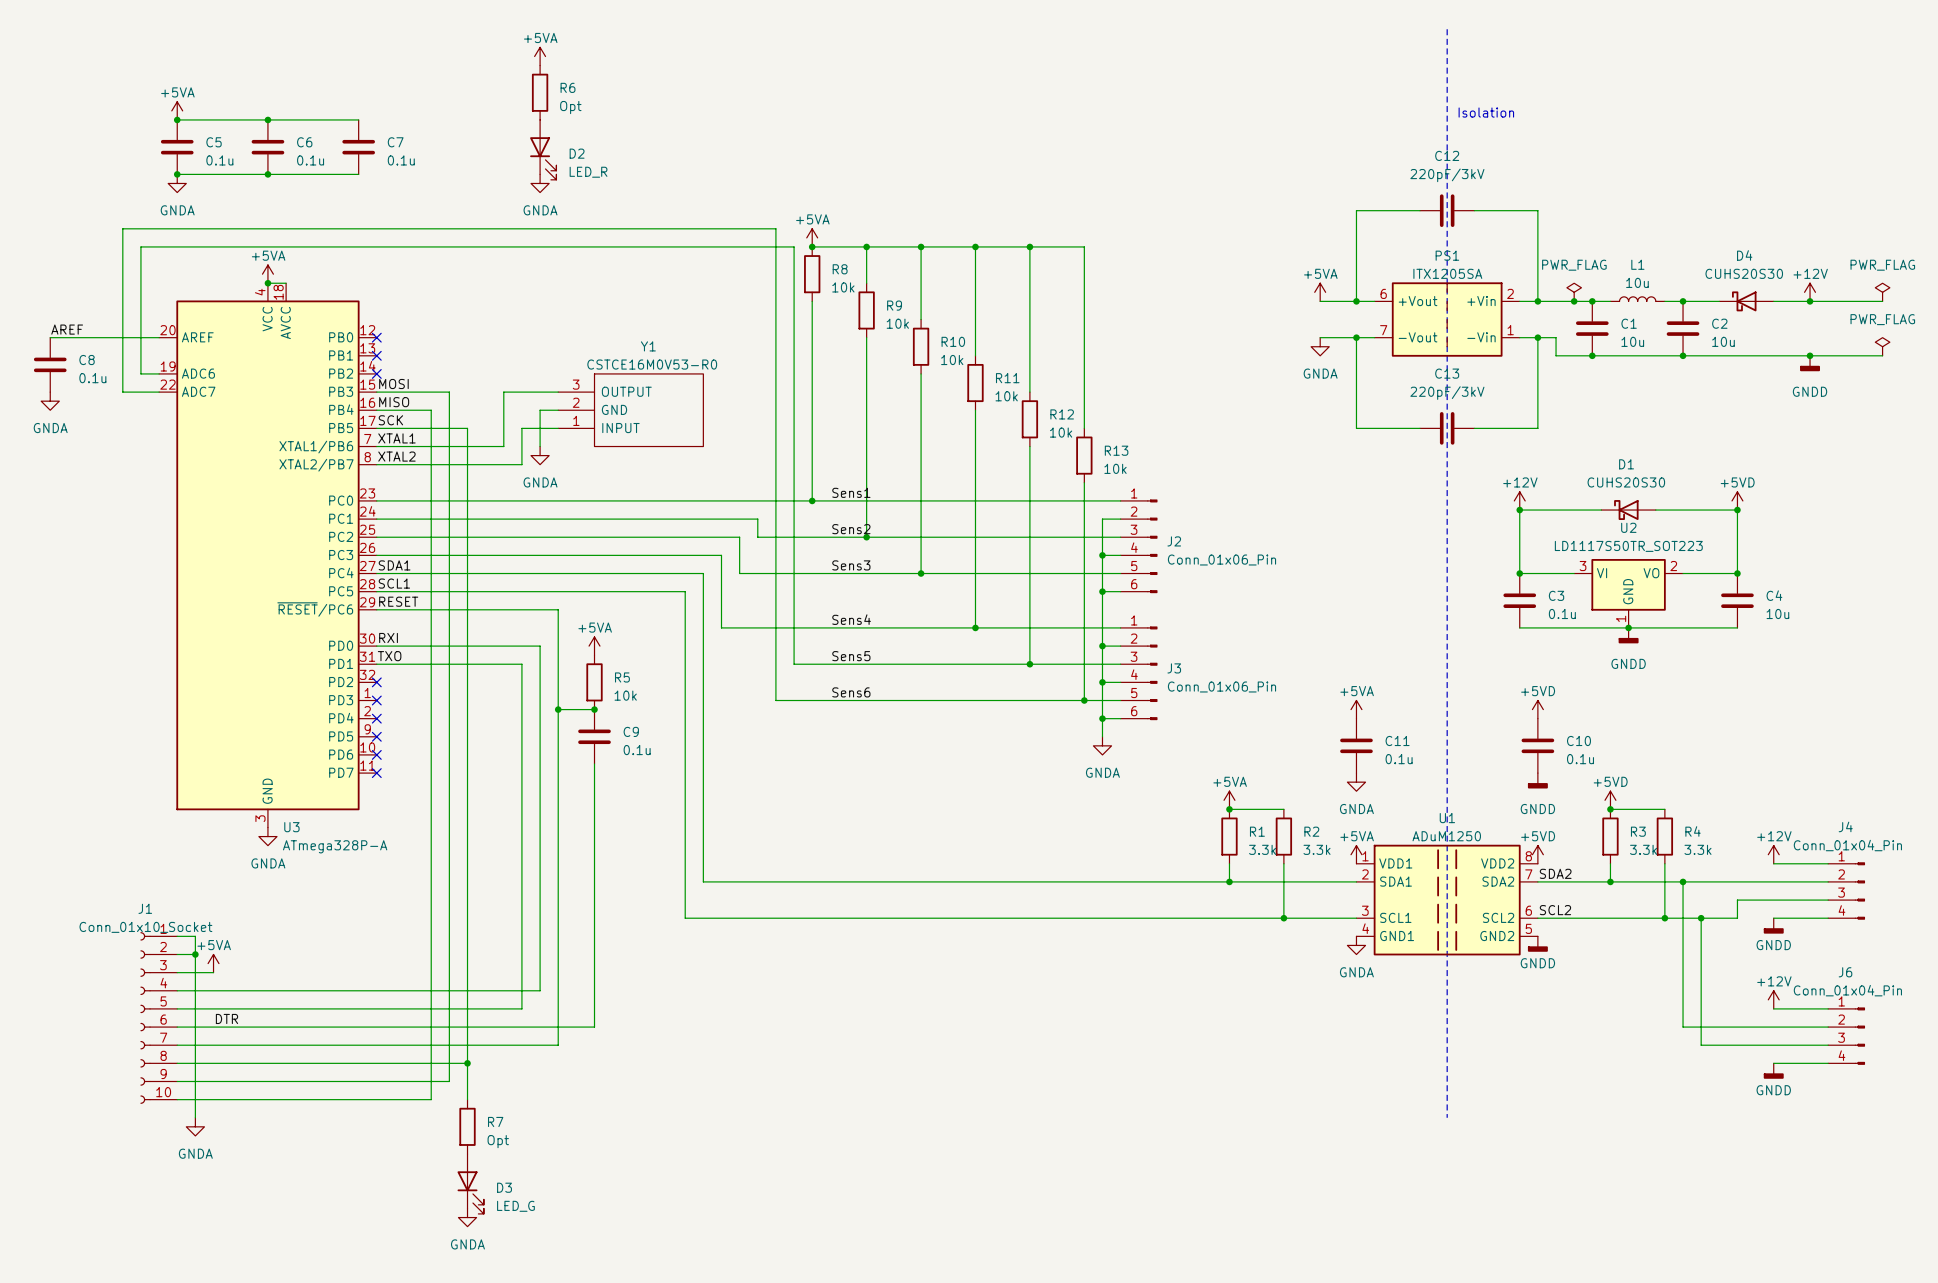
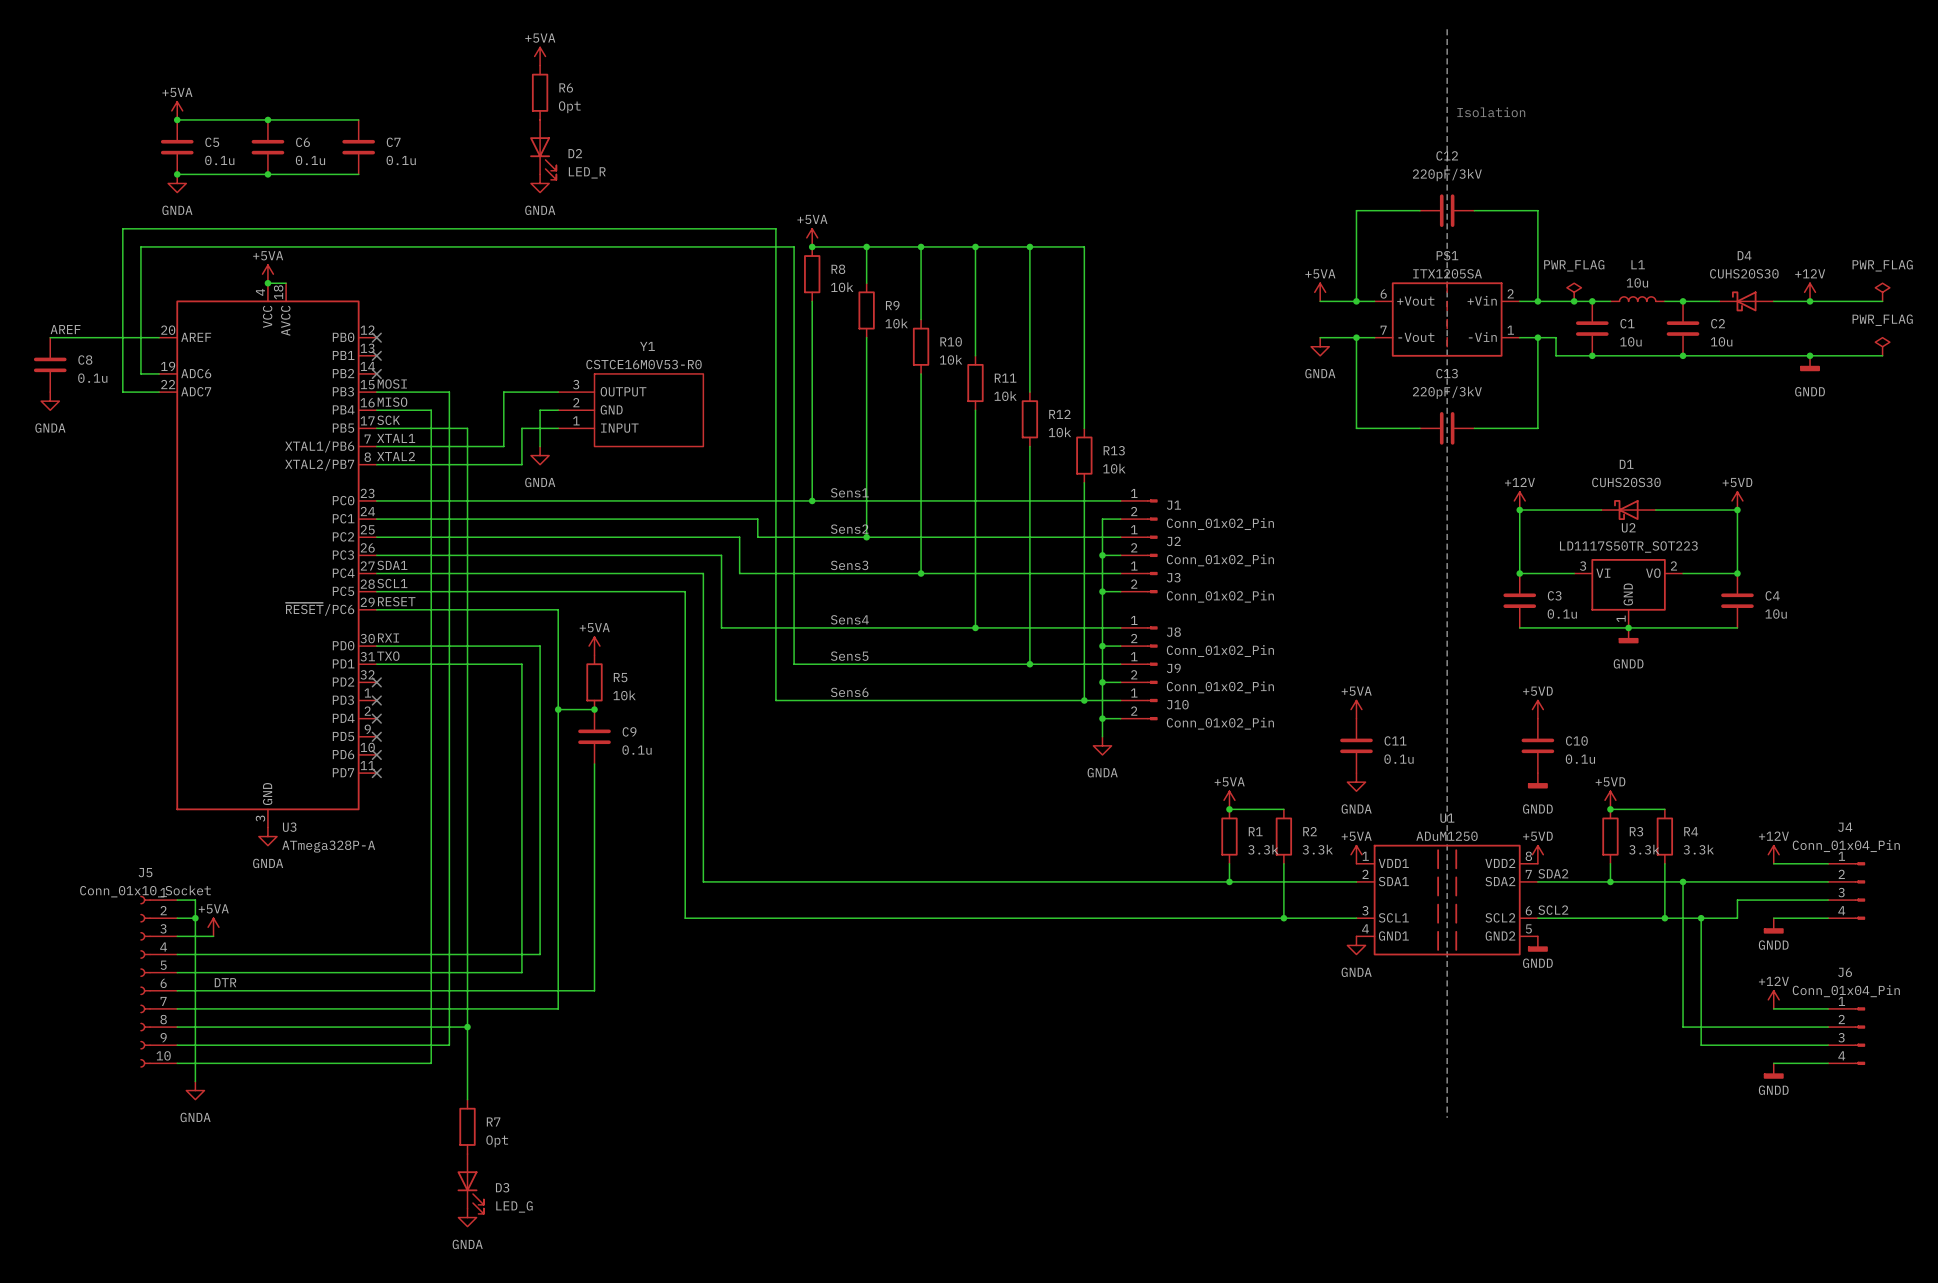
J2 symbol: [1120, 499, 1158, 594] -> [1120, 535, 1158, 557]
J2 value: Conn_01x06_Pin (1221, 560) -> Conn_01x02_Pin (1220, 560)
J3 symbol: [1120, 626, 1158, 721] -> [1120, 572, 1158, 594]
J8: none -> Conn_01x02_Pin (1139, 637)
J9: none -> Conn_01x02_Pin (1139, 673)
J3 value: Conn_01x06_Pin (1221, 686) -> Conn_01x02_Pin (1220, 596)
J10: none -> Conn_01x02_Pin (1139, 709)
wire: none -> (177, 900) (195, 900) (195, 936) (213, 936)
J1 name position: J1 (145, 908) -> J1 (1173, 505)
wire: none -> (177, 918) (195, 918)
J1 value: Conn_01x10_Socket (145, 927) -> Conn_01x02_Pin (1220, 524)
J1 symbol: [140, 932, 178, 1104] -> [1120, 499, 1158, 521]
wire: none -> (195, 954) (540, 954)
junction position: (195, 954) -> (195, 918)
wire: (540, 954) (540, 990) -> (594, 990) (540, 990)
power symbol position: +5VA (213, 963) -> +5VA (213, 927)
wire: none -> (213, 972) (521, 972)
wire: (521, 972) (521, 1008) -> (558, 1008) (521, 1008)
J5: none -> Conn_01x10_Socket (158, 981)
wire: (594, 990) (594, 1027) (467, 1027) -> none
wire: (558, 1008) (558, 1045) (449, 1045) (449, 1081) (177, 1081) -> none
label position: DTR (226, 1018) -> DTR (225, 982)
wire: (467, 1063) (431, 1063) (431, 1099) (177, 1099) -> none
junction position: (467, 1063) -> (467, 1027)
wire: (195, 1081) (195, 1117) -> none
power symbol position: GNDA (195, 1126) -> GNDA (195, 1090)

